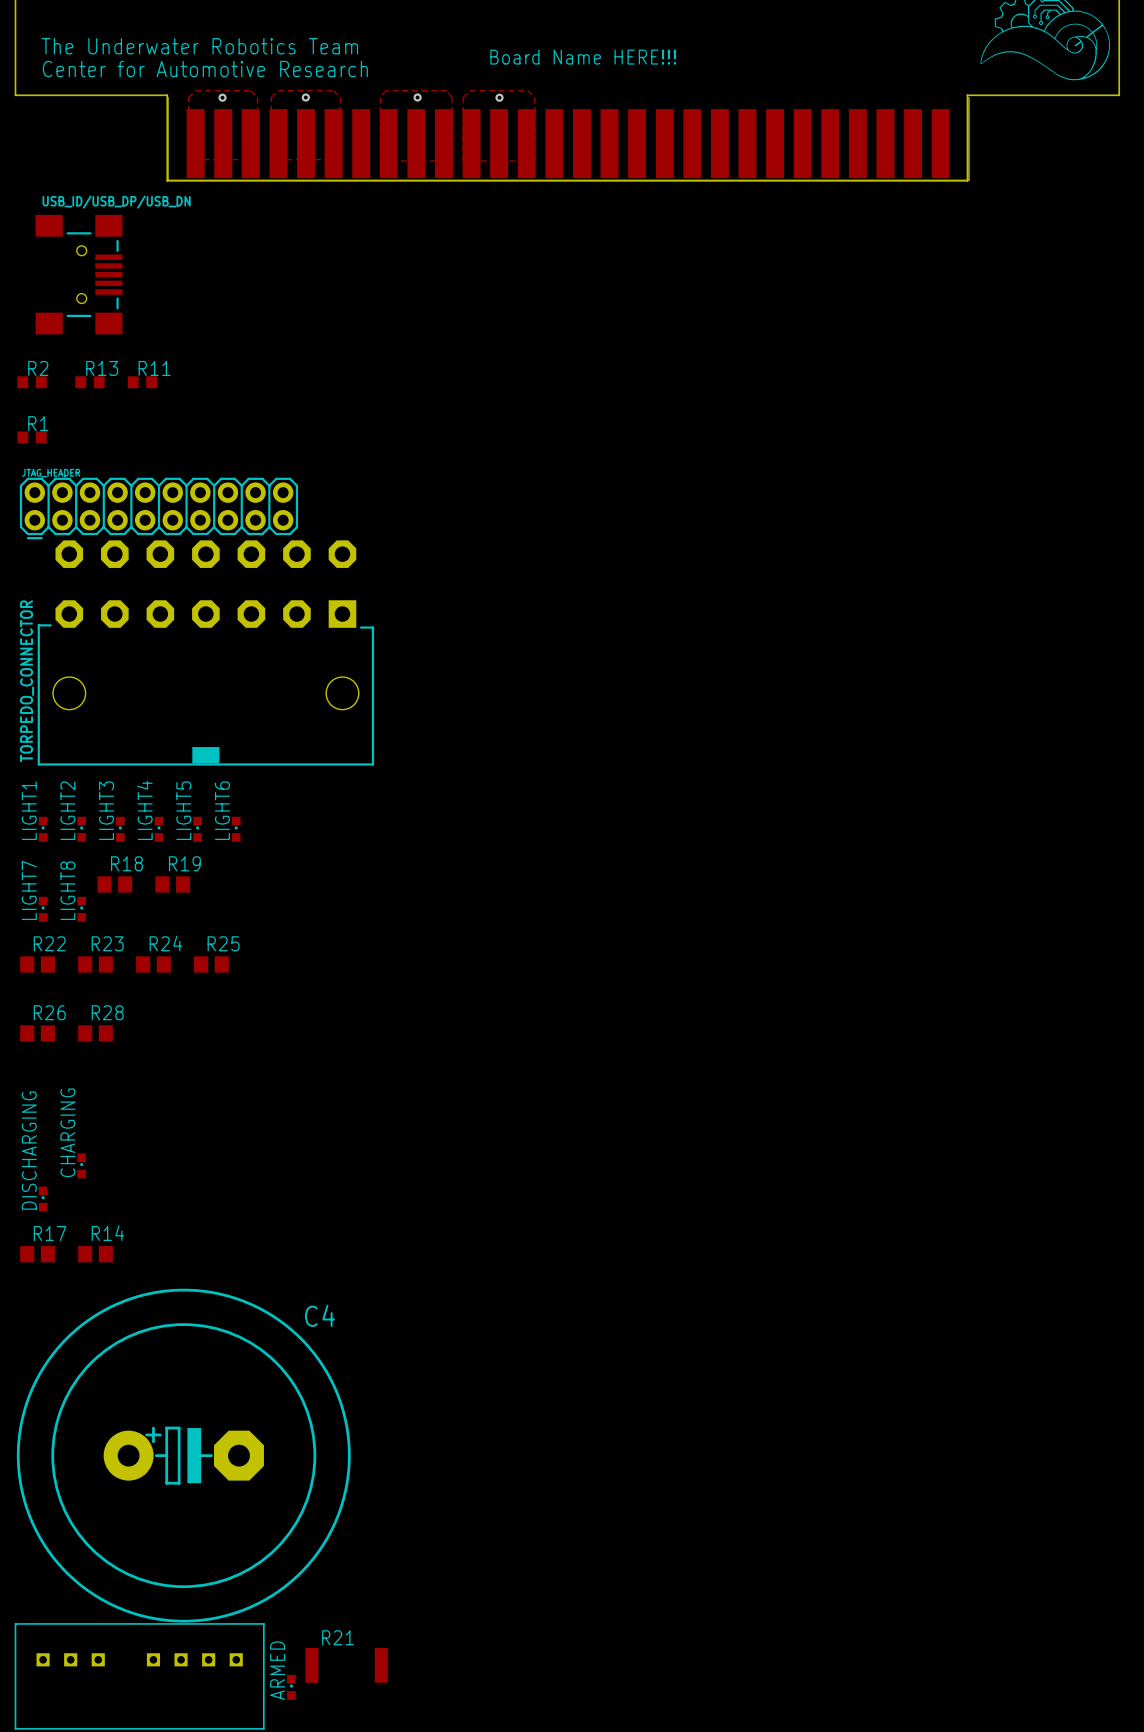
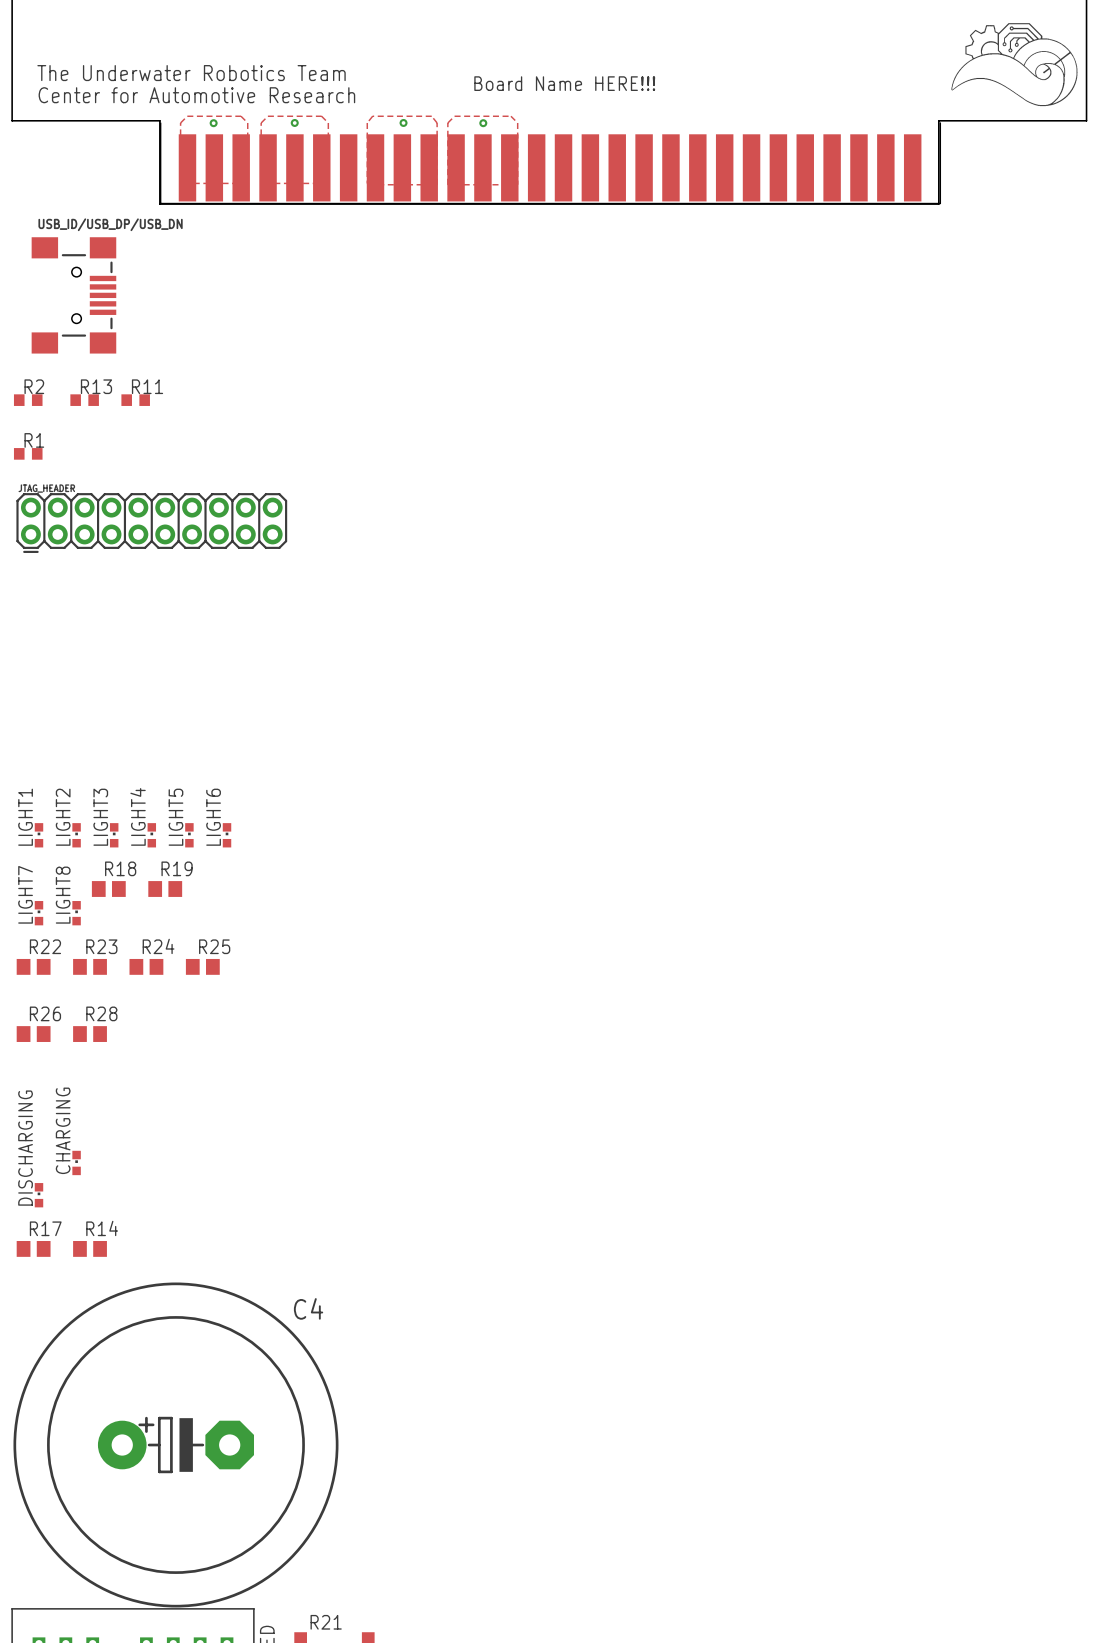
TORPEDO_CONNECTOR: (205, 652) -> none

